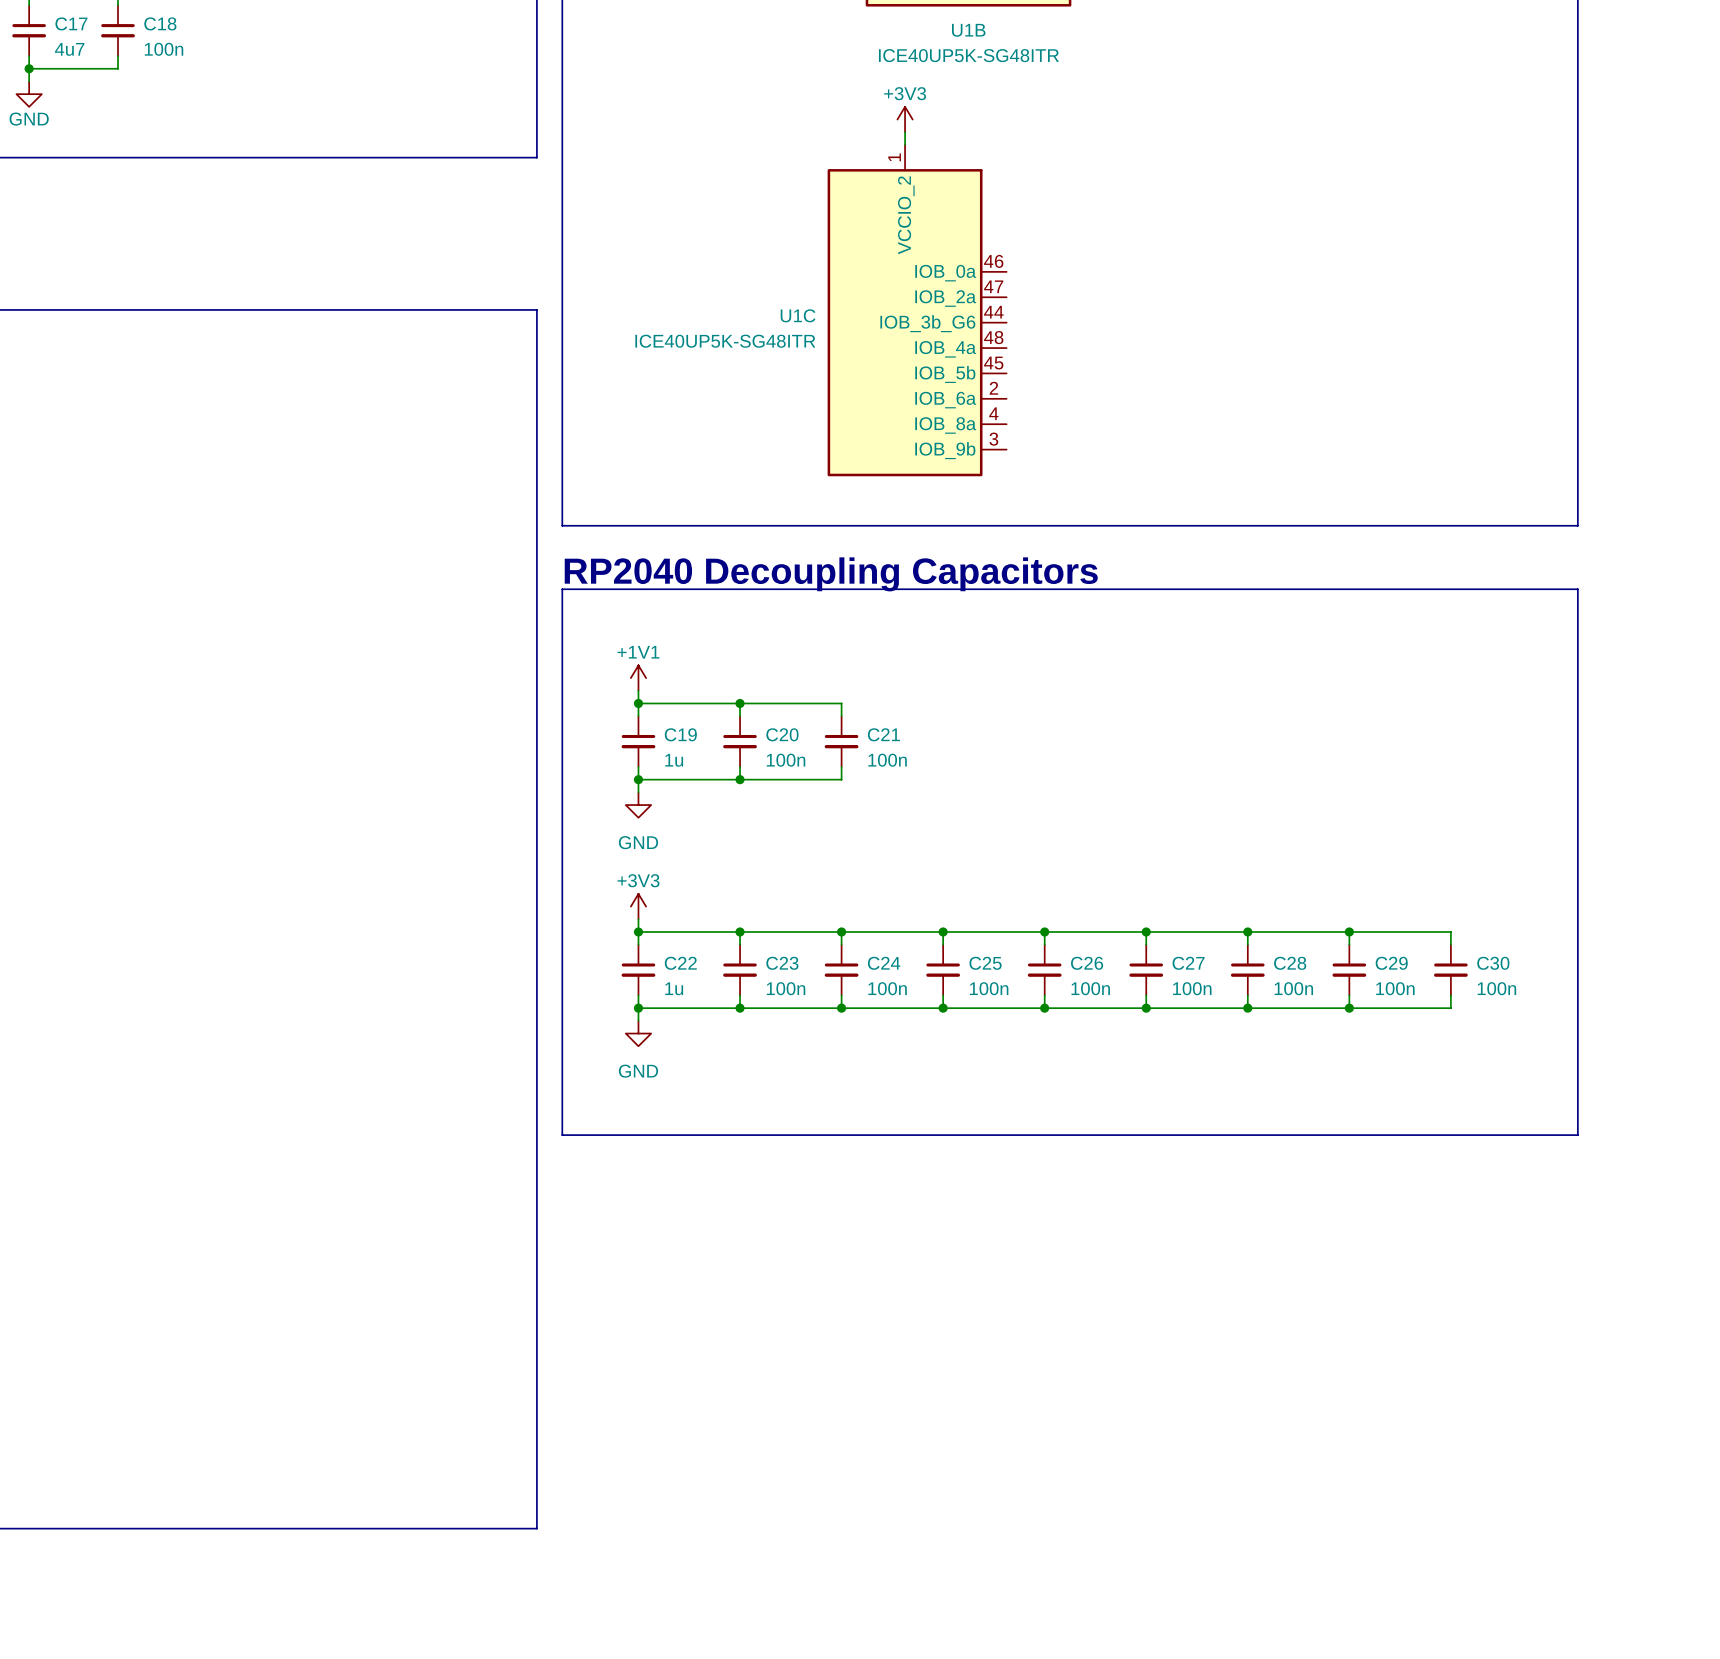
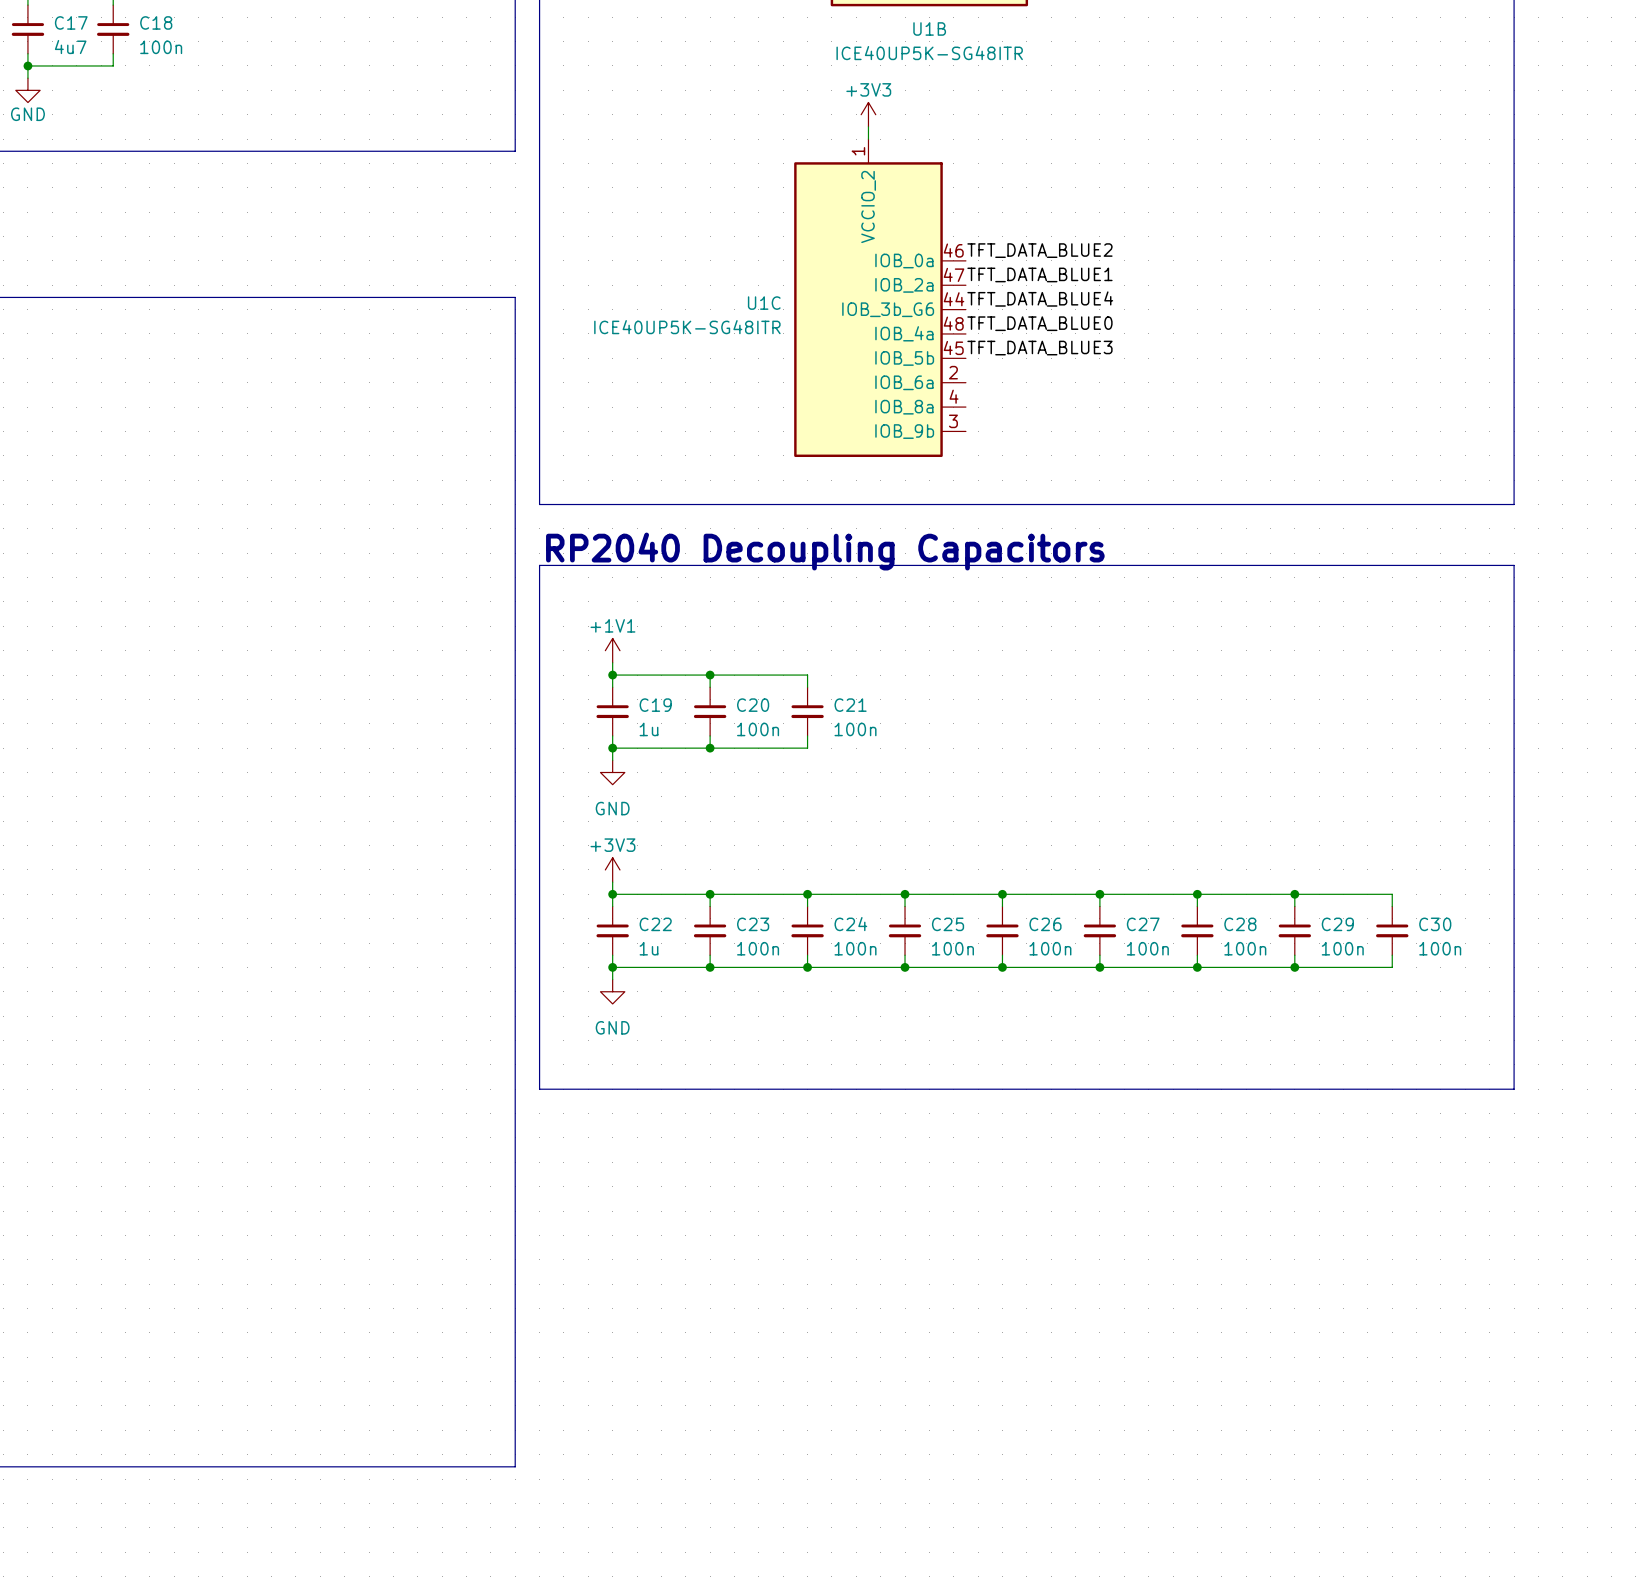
label: none -> TFT_DATA_BLUE2 (1039, 250)
label: none -> TFT_DATA_BLUE1 (1039, 274)
label: none -> TFT_DATA_BLUE4 (1040, 299)
label: none -> TFT_DATA_BLUE0 (1039, 323)
label: none -> TFT_DATA_BLUE3 (1039, 348)

